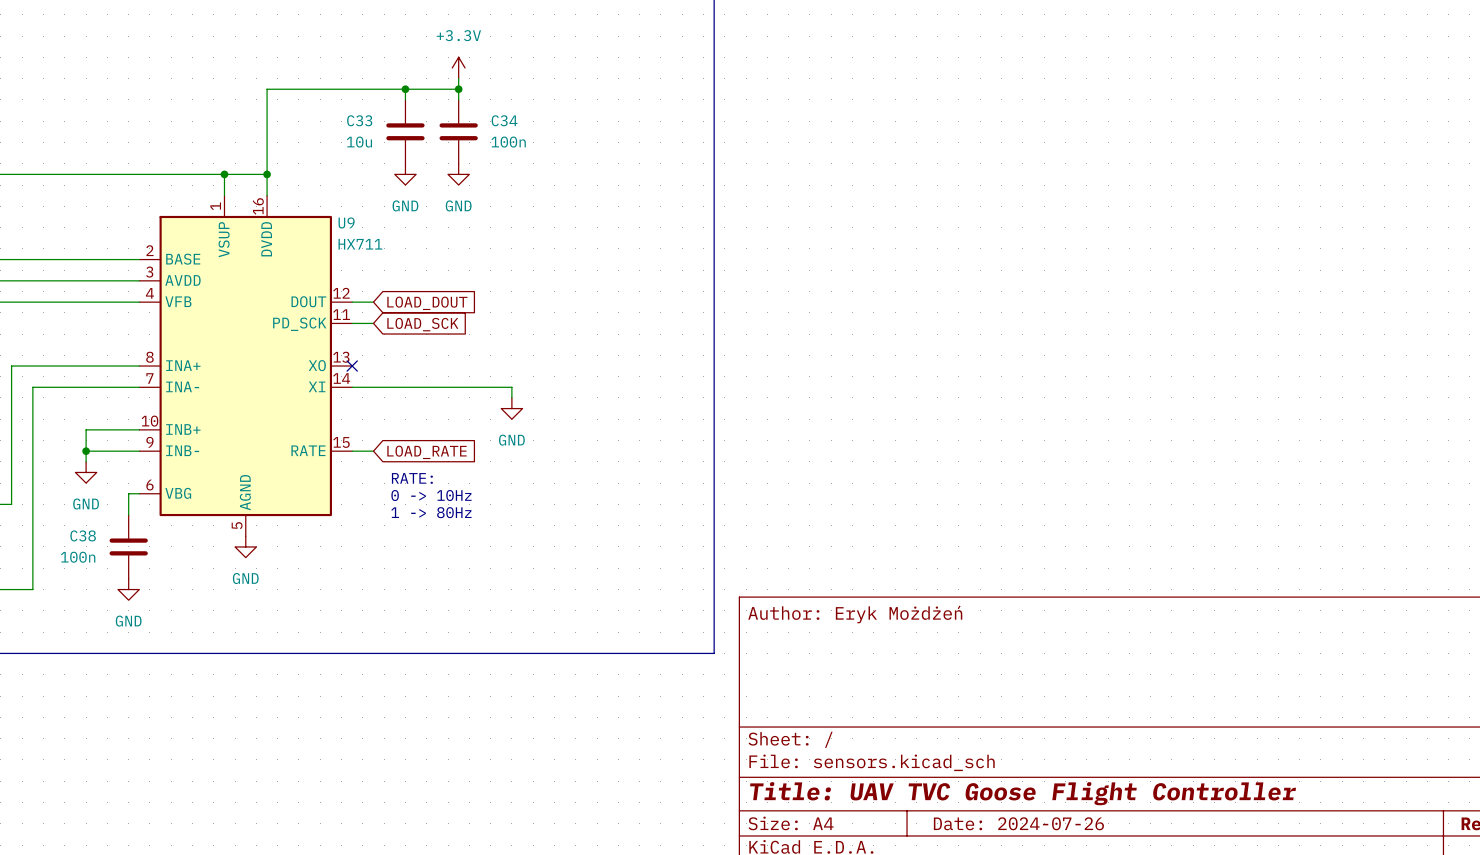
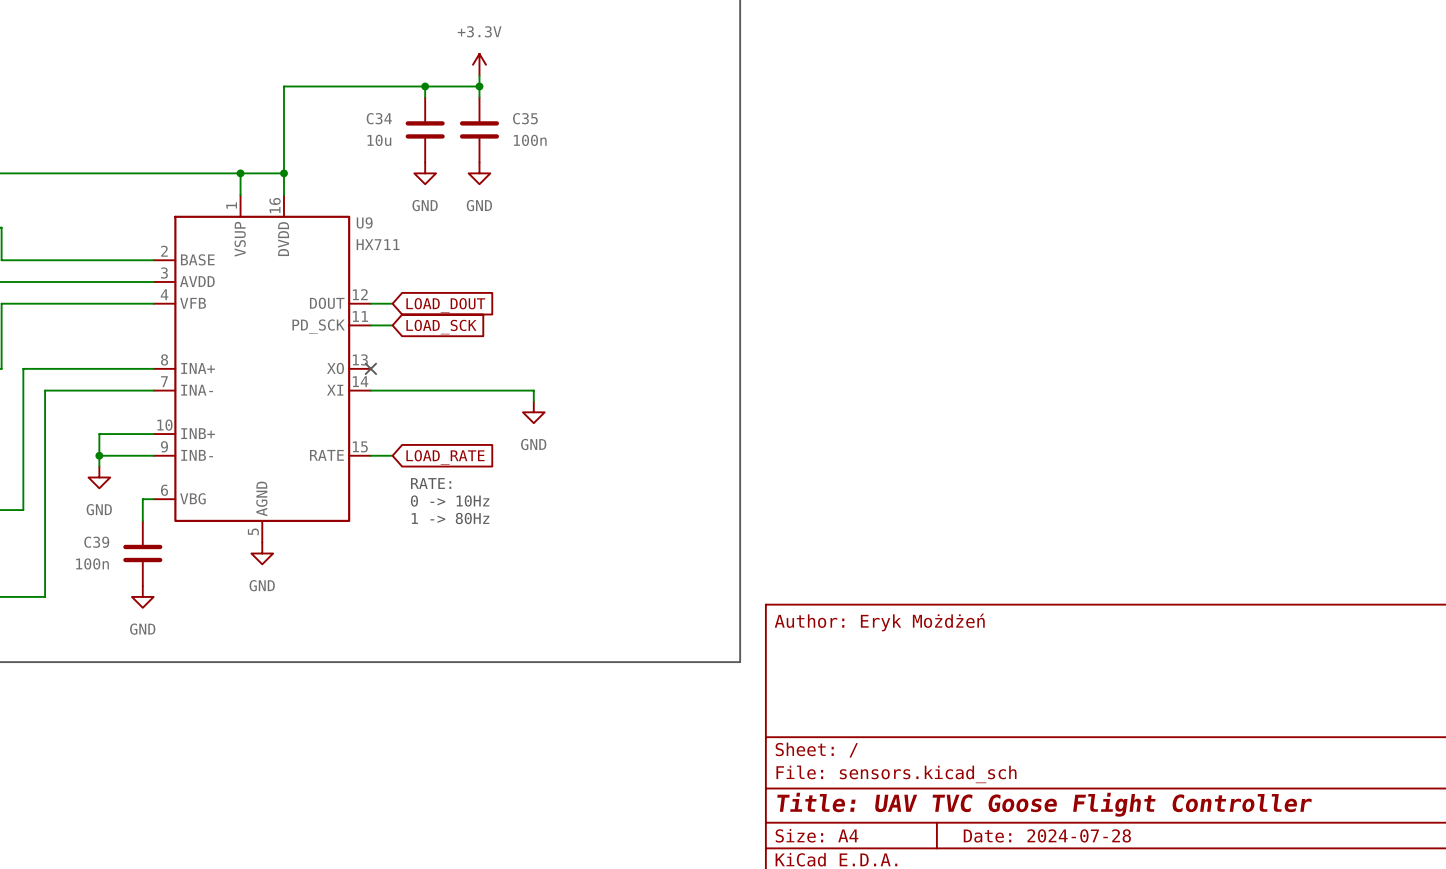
C33 name: C33 (359, 120) -> C34 (379, 118)
C34 name: C34 (504, 120) -> C35 (525, 118)
C38 name: C38 (83, 535) -> C39 (96, 542)
title block: Date: 2024-07-26 (1018, 823) -> Date: 2024-07-28 (1047, 835)

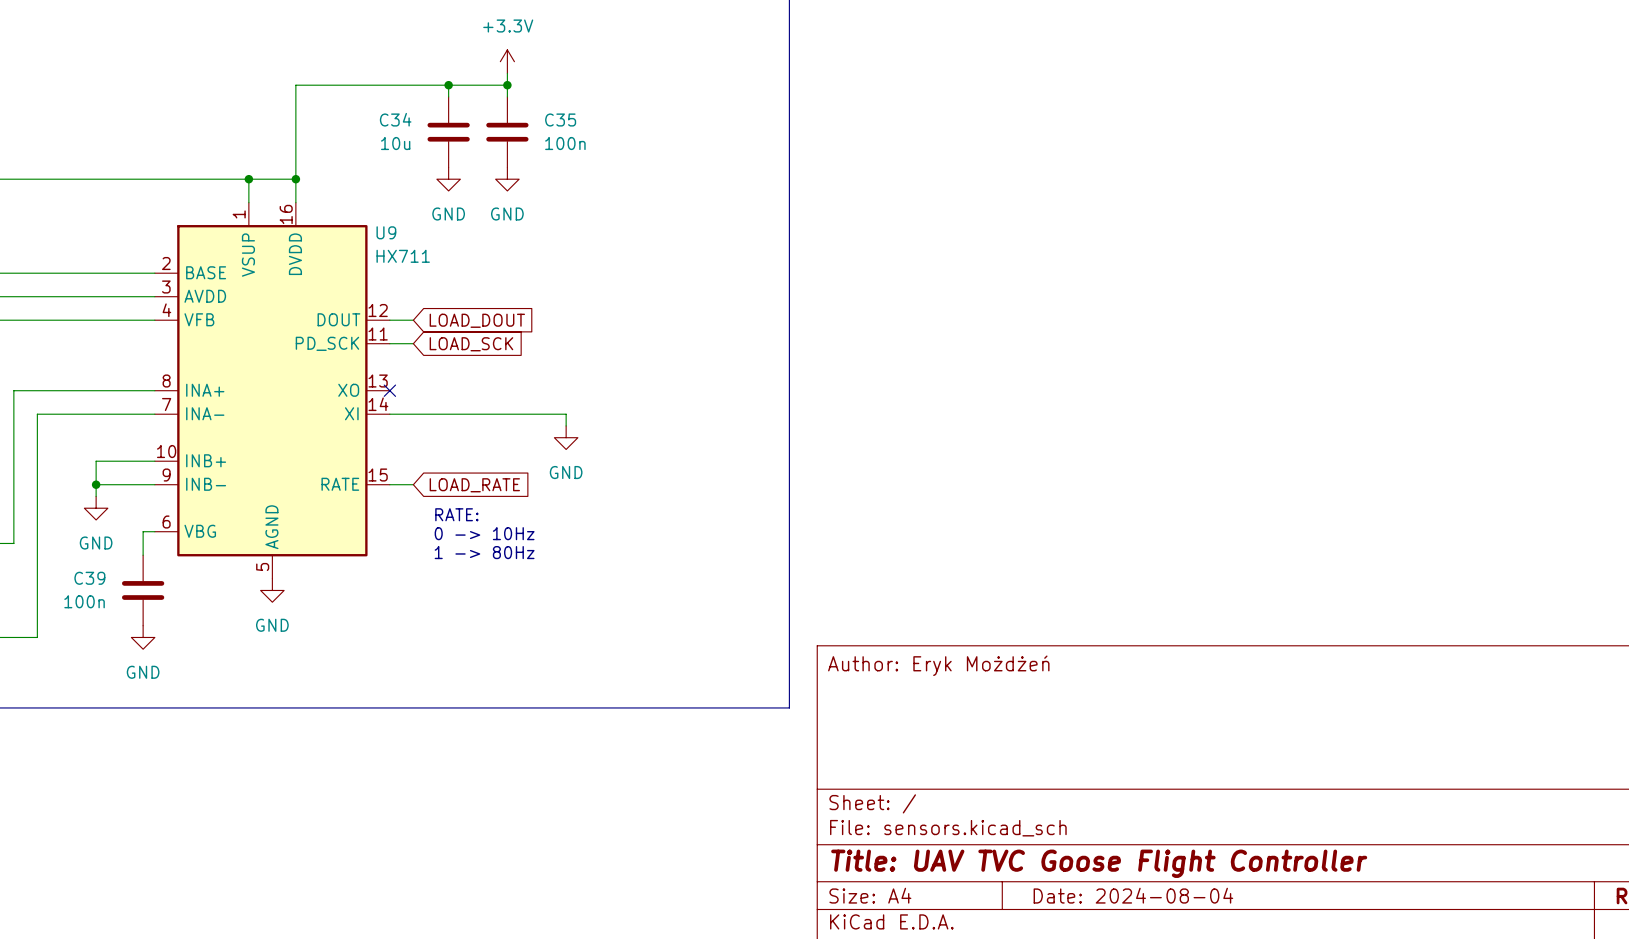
title block: Date: 2024-07-28 (1047, 835) -> Date: 2024-08-04 (1133, 895)

